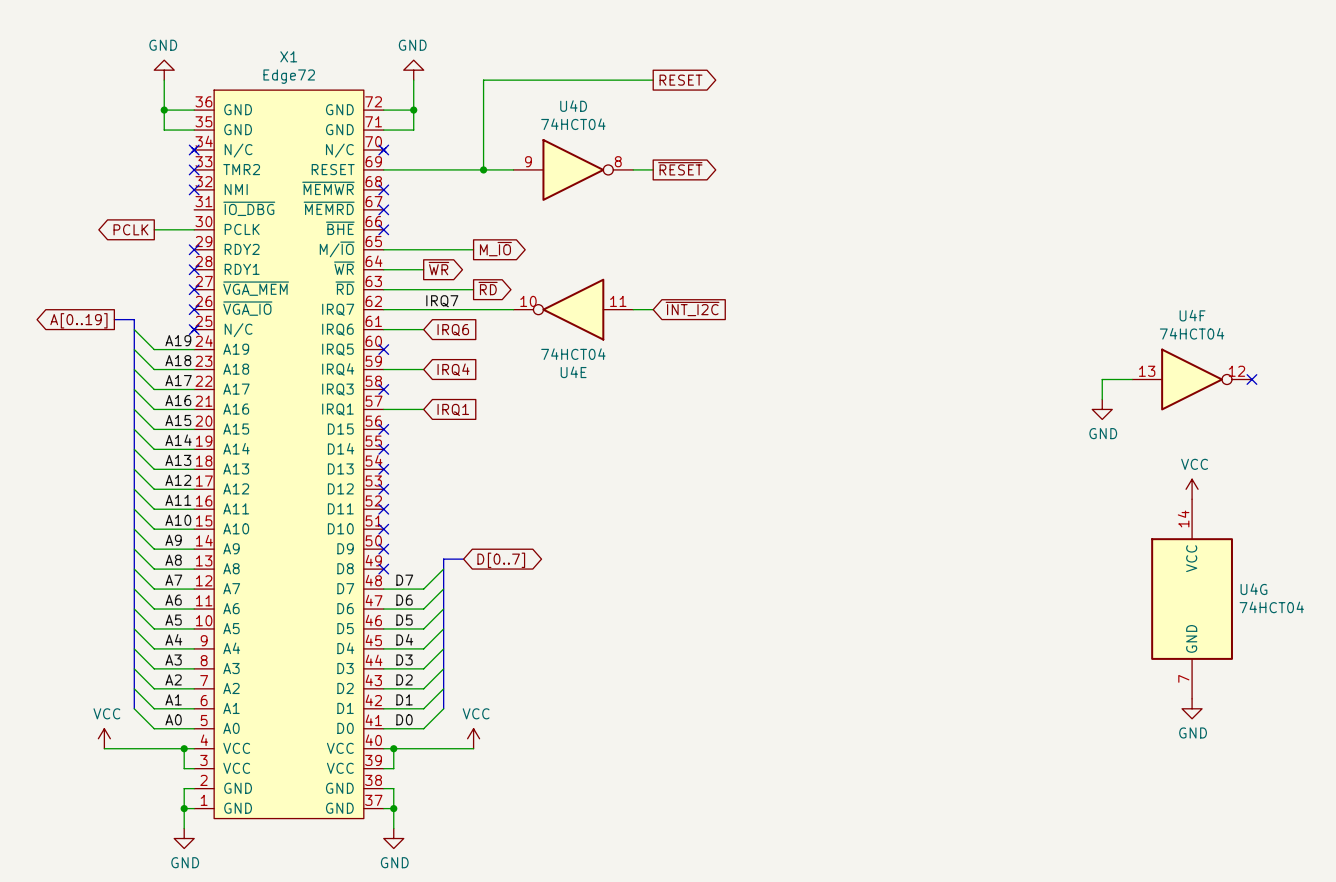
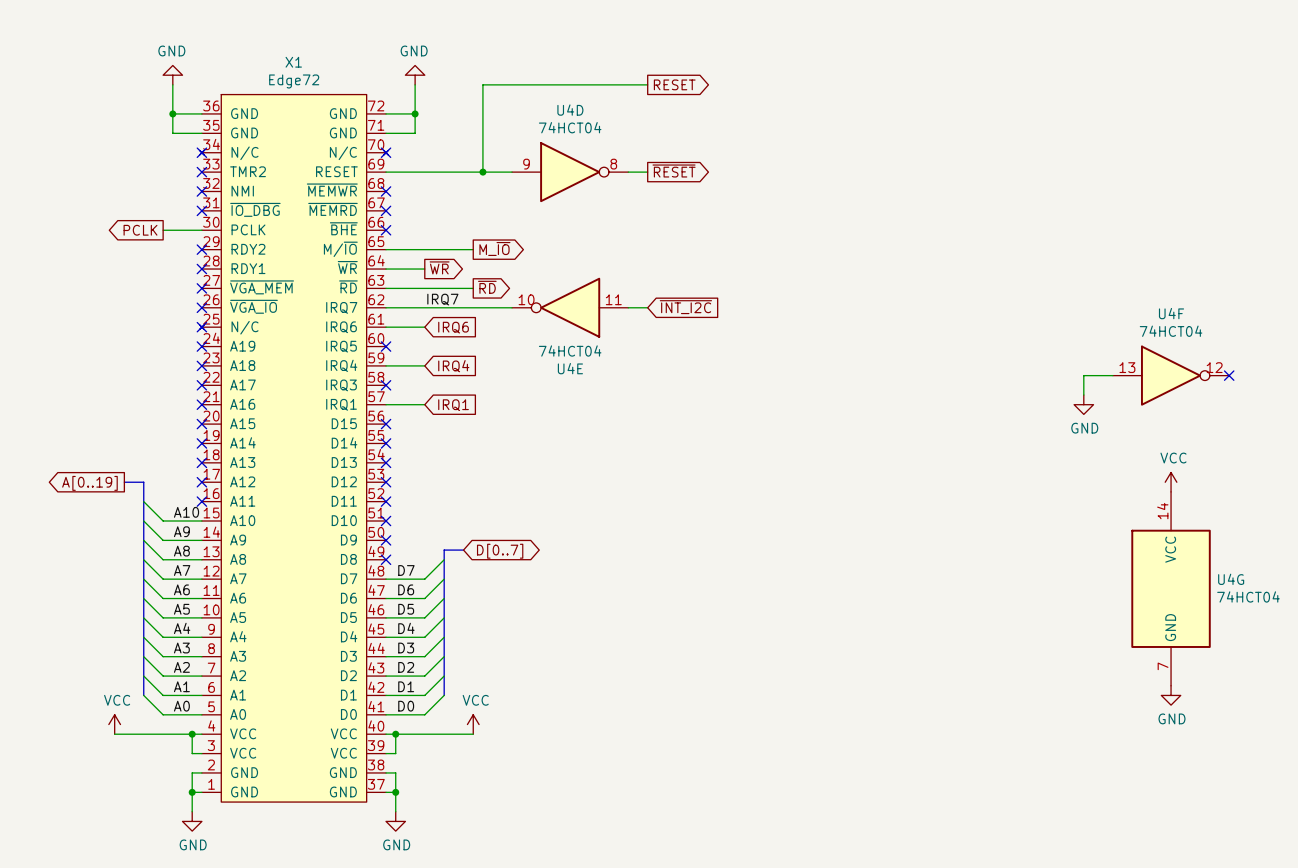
no-connect mark: none -> (201, 210)
bus: (114, 319) (134, 319) (134, 489) -> (124, 482) (143, 482)
global label position: A[0..19] (78, 320) -> A[0..19] (89, 483)
wire: (134, 329) (154, 349) (194, 349) -> none
label: A19 (178, 340) -> none
wire: (134, 349) (154, 369) (194, 369) -> none
no-connect mark: none -> (201, 346)
label: A18 (178, 360) -> none
wire: (134, 369) (154, 389) (194, 389) -> none
no-connect mark: none -> (201, 365)
label: A17 (178, 380) -> none
wire: (134, 389) (154, 409) (194, 409) -> none
no-connect mark: none -> (201, 385)
label: A16 (178, 400) -> none
wire: (134, 409) (154, 429) (194, 429) -> none
no-connect mark: none -> (201, 404)
label: A15 (178, 420) -> none
wire: (134, 429) (154, 449) (194, 449) -> none
no-connect mark: none -> (201, 424)
label: A14 (178, 440) -> none
wire: (134, 449) (154, 469) (194, 469) -> none
no-connect mark: none -> (201, 443)
label: A13 (178, 460) -> none
wire: (134, 469) (154, 489) (194, 489) -> none
no-connect mark: none -> (201, 462)
label: A12 (178, 480) -> none
wire: (134, 489) (154, 509) (194, 509) -> none
no-connect mark: none -> (201, 482)
label: A11 (178, 500) -> none
no-connect mark: none -> (201, 501)

